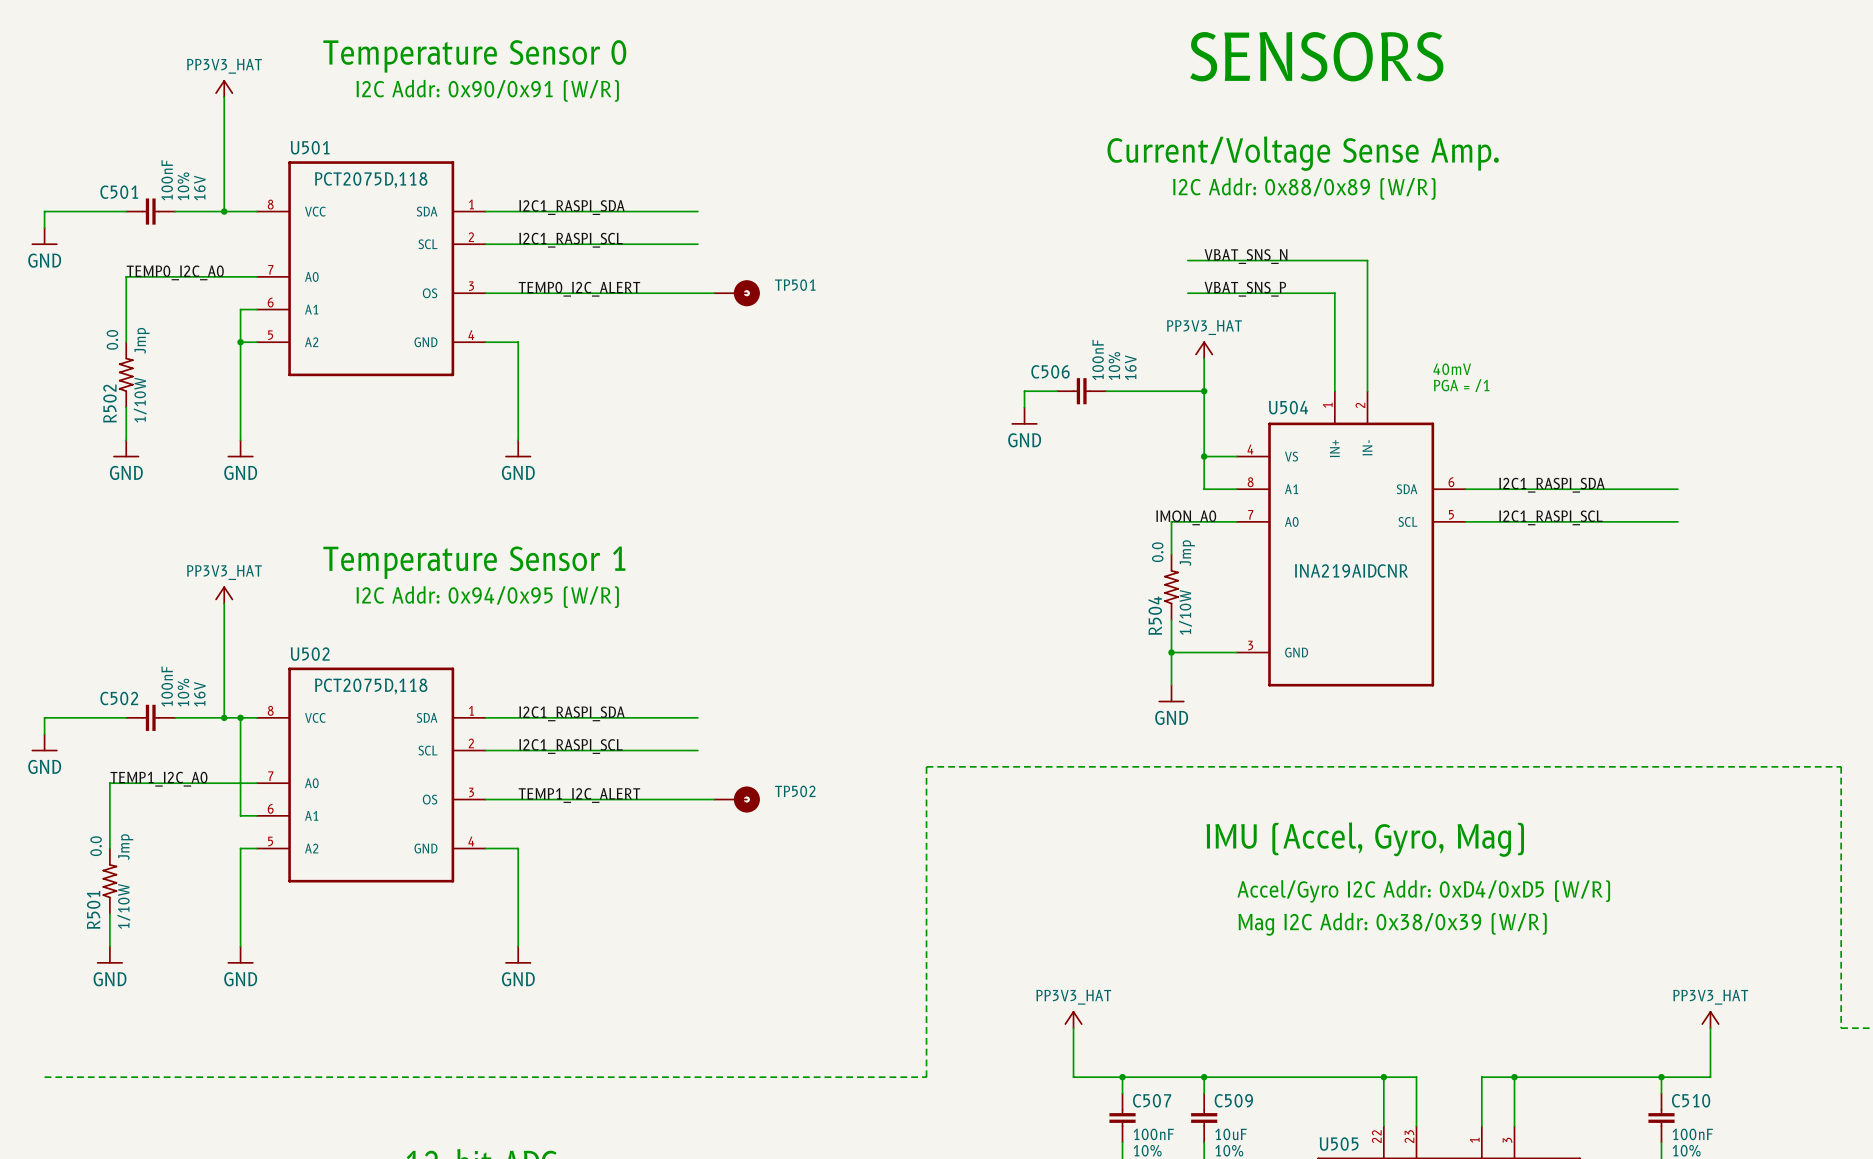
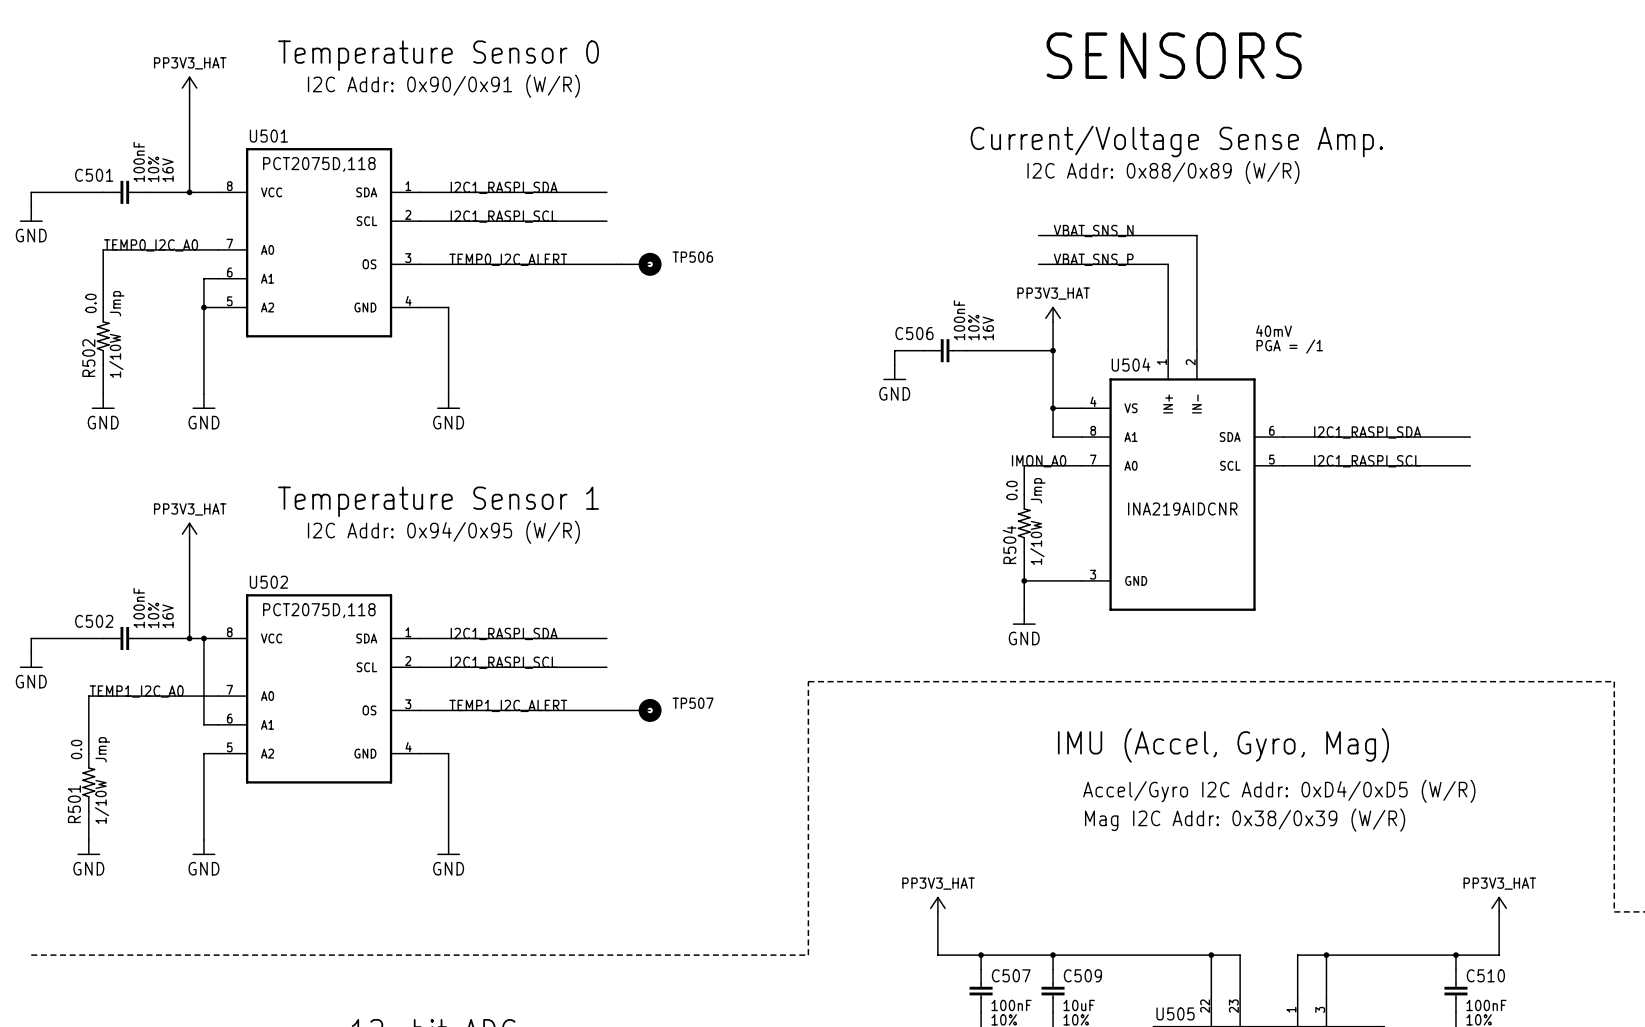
TP501 name: TP501 (795, 285) -> TP506 (692, 257)
TP502 name: TP502 (795, 791) -> TP507 (693, 703)

